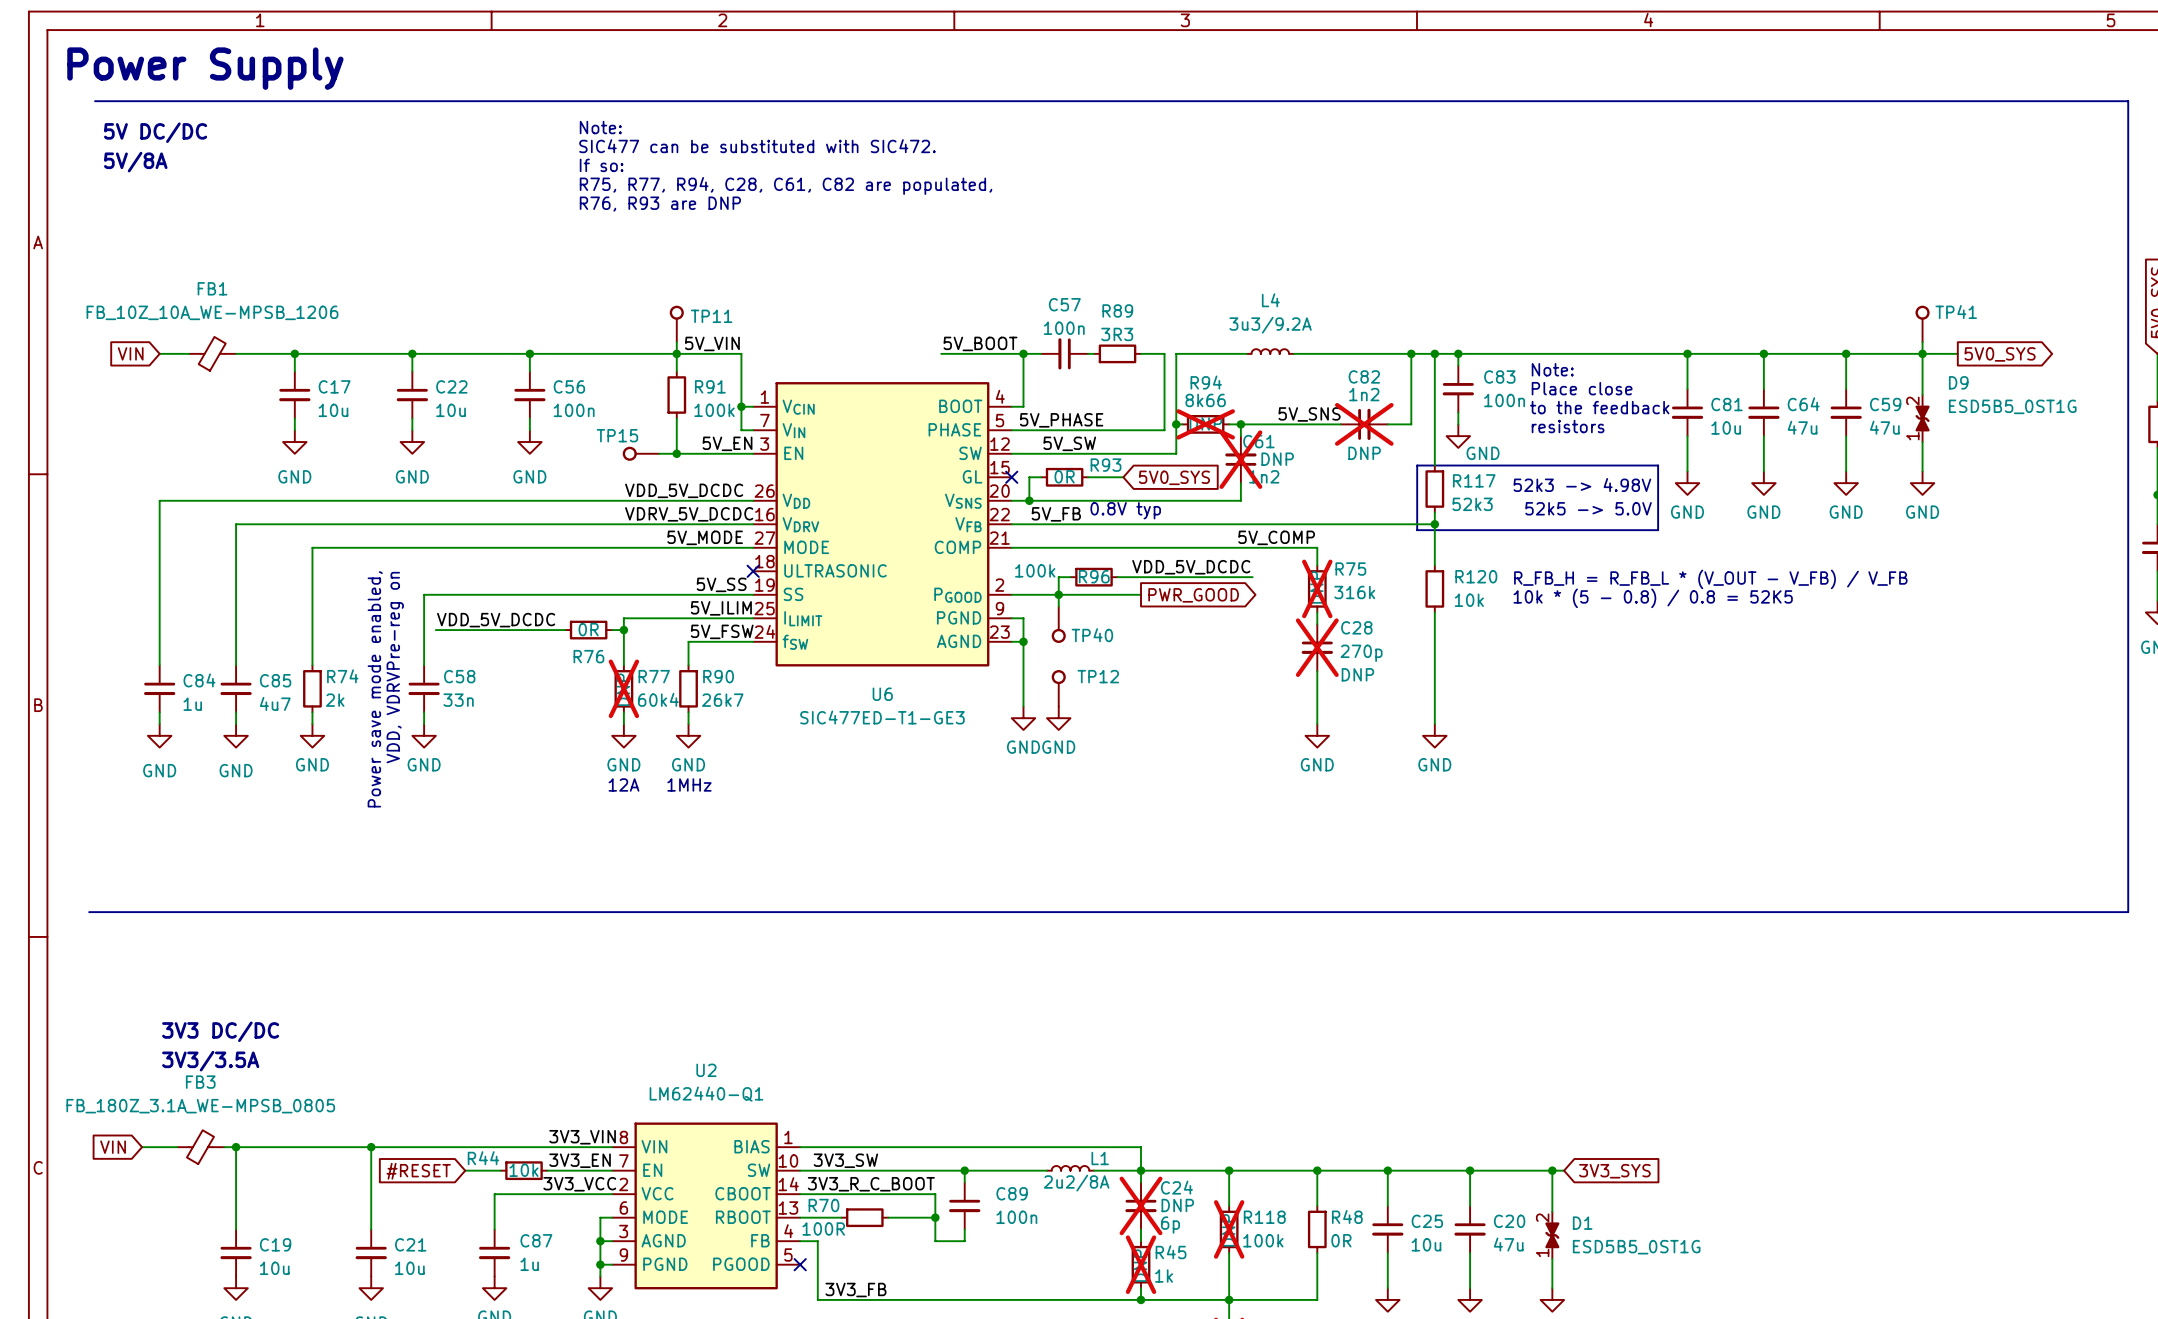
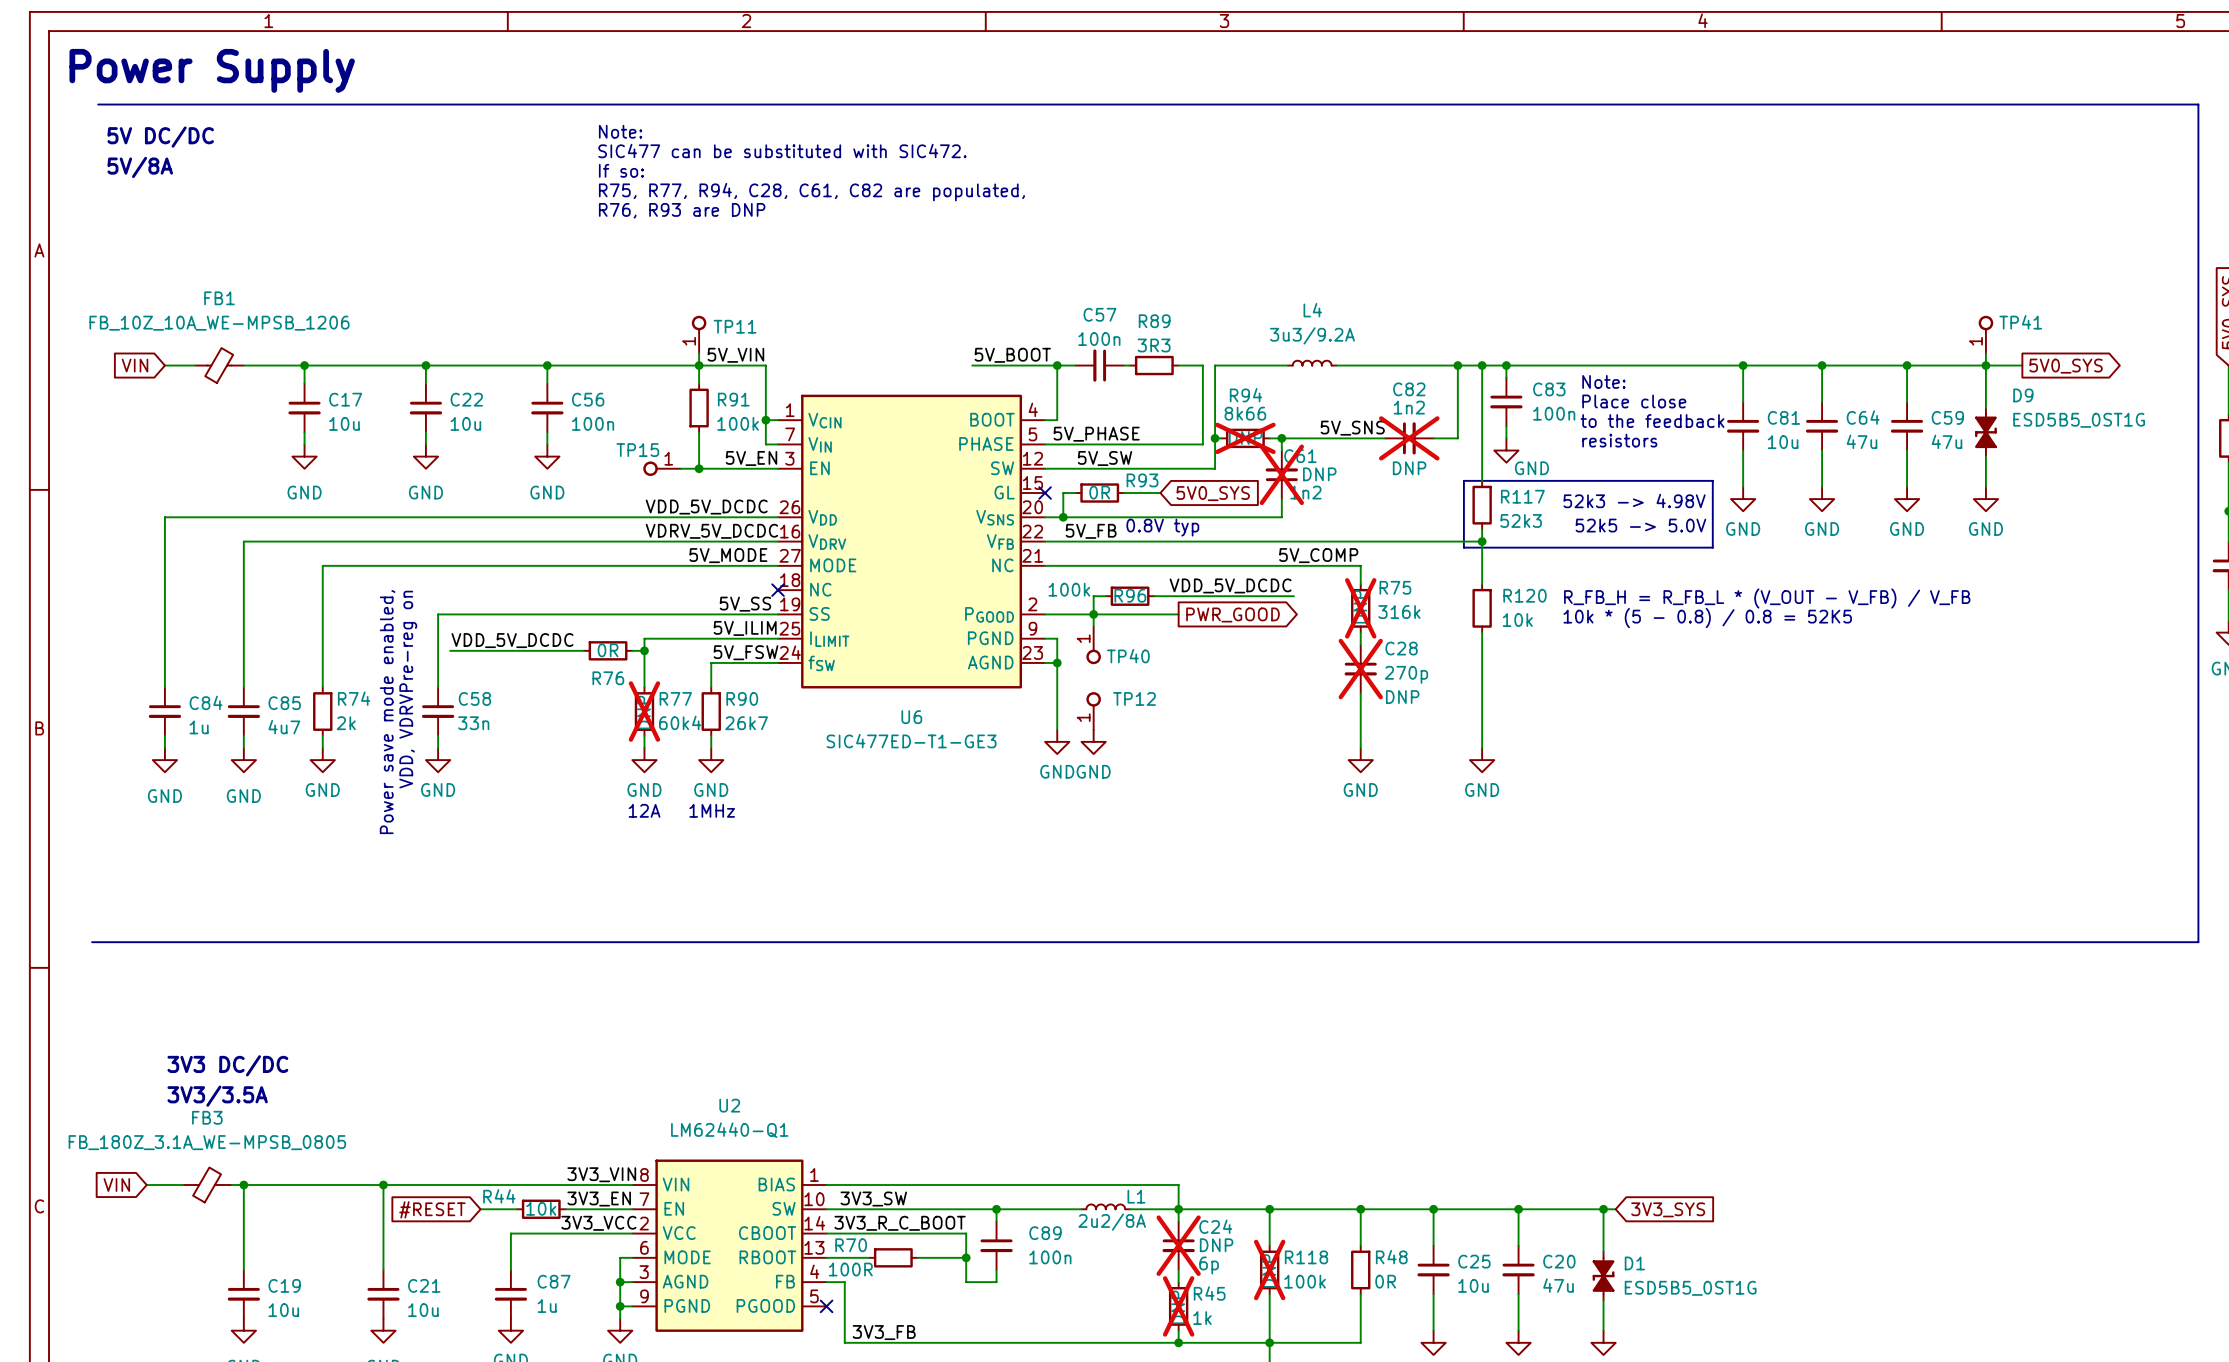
TP11 pin number: none -> 1 (689, 341)
TP41 pin number: none -> 1 (1975, 341)
D9 symbol: [1915, 395, 1930, 443] -> [1975, 408, 1997, 457]
TP15 pin number: none -> 1 (668, 458)
U6 pin name: COMP (957, 547) -> NC (1002, 565)
U6 pin name: ULTRASONIC (835, 570) -> NC (820, 589)
TP40 pin number: none -> 1 (1083, 638)
TP12 pin number: none -> 1 (1083, 717)
D1 symbol: [1545, 1211, 1560, 1259] -> [1592, 1251, 1615, 1301]

